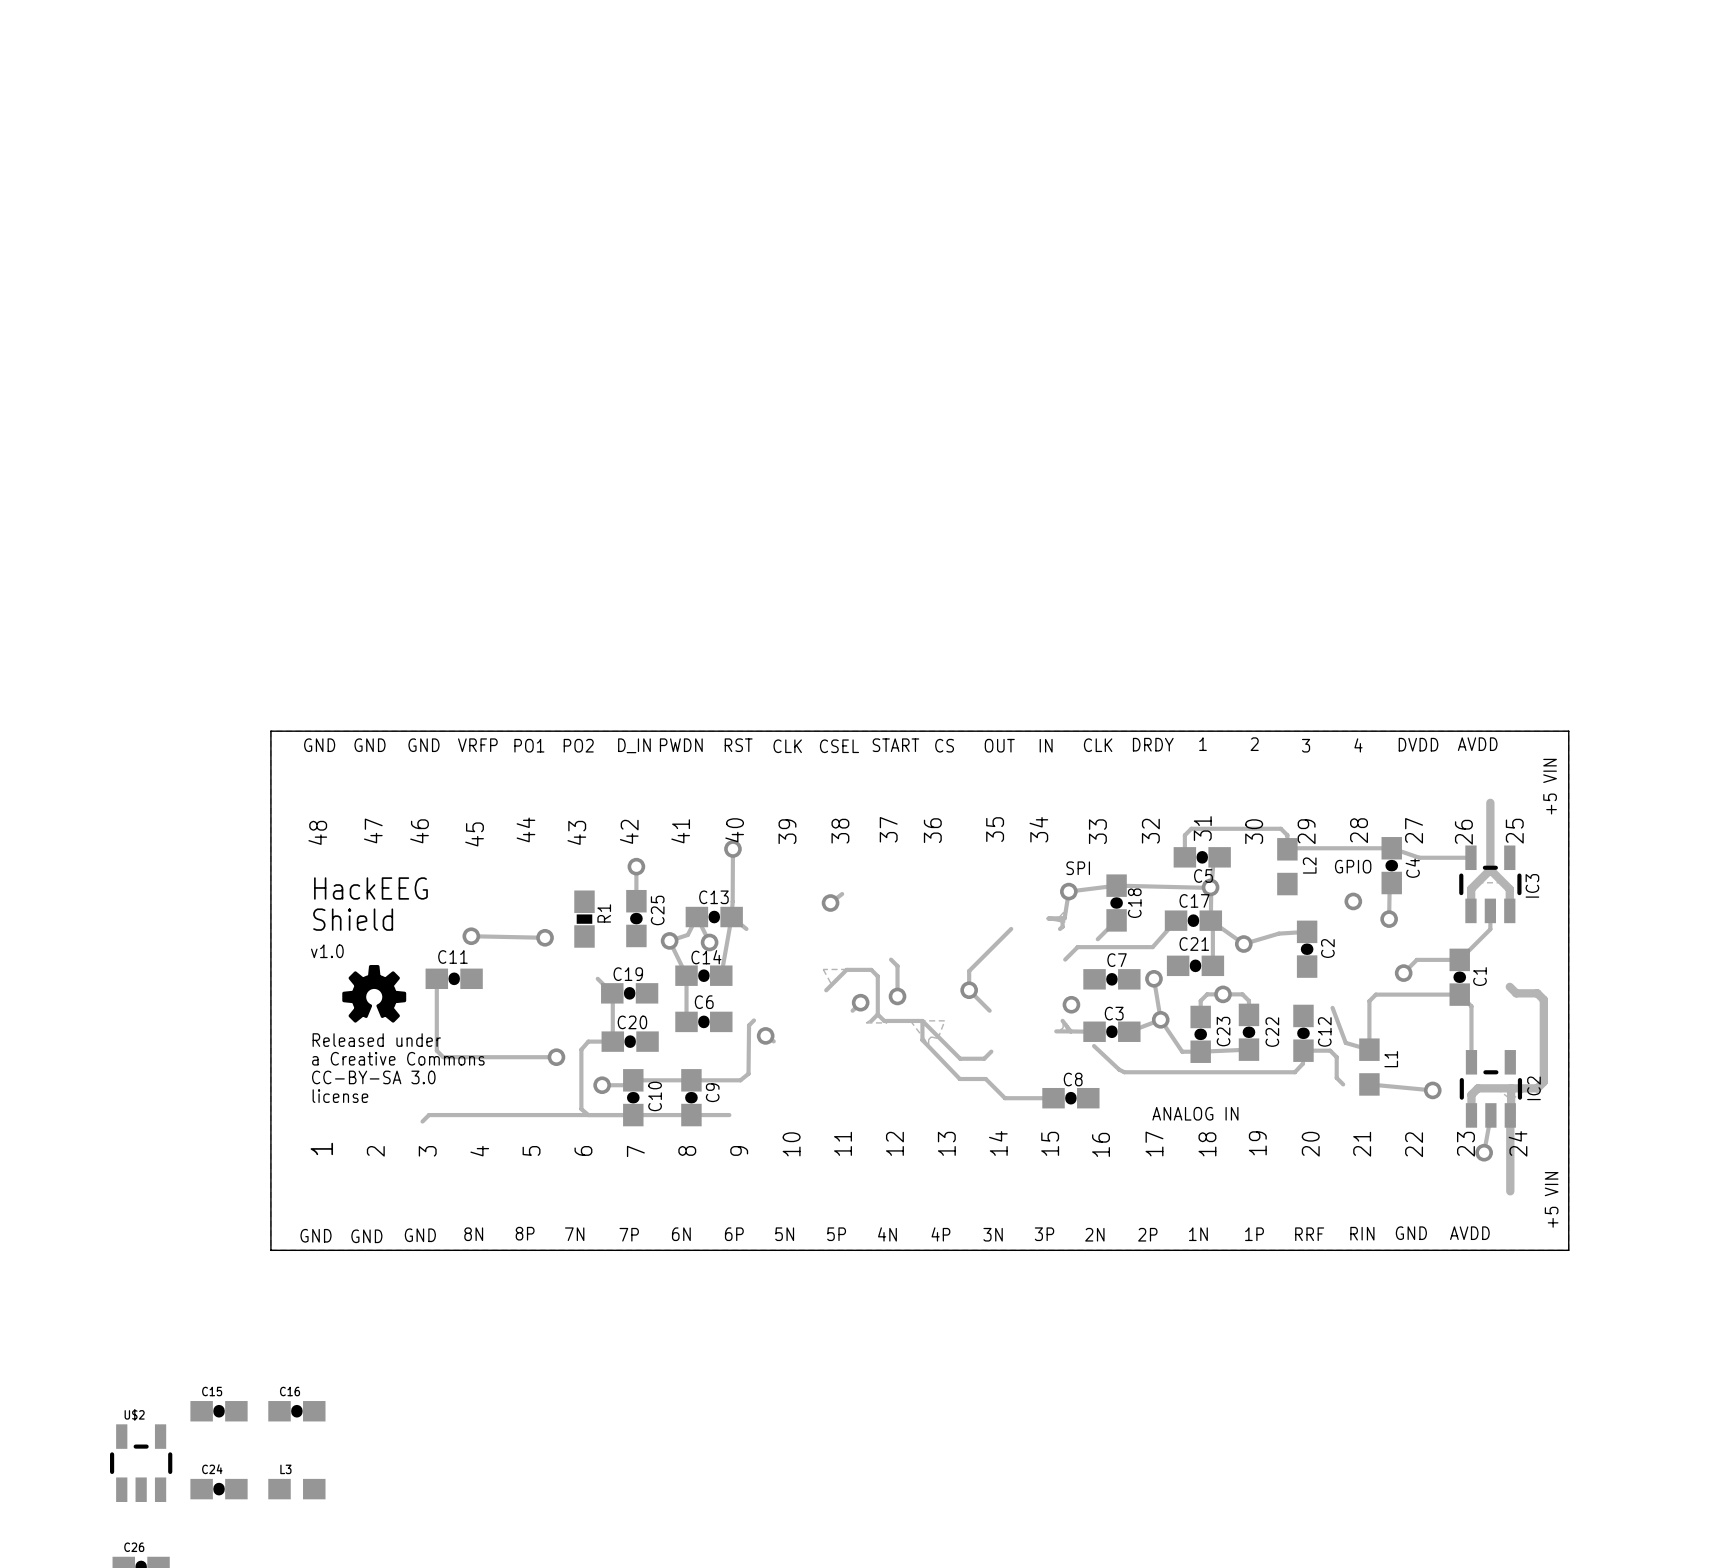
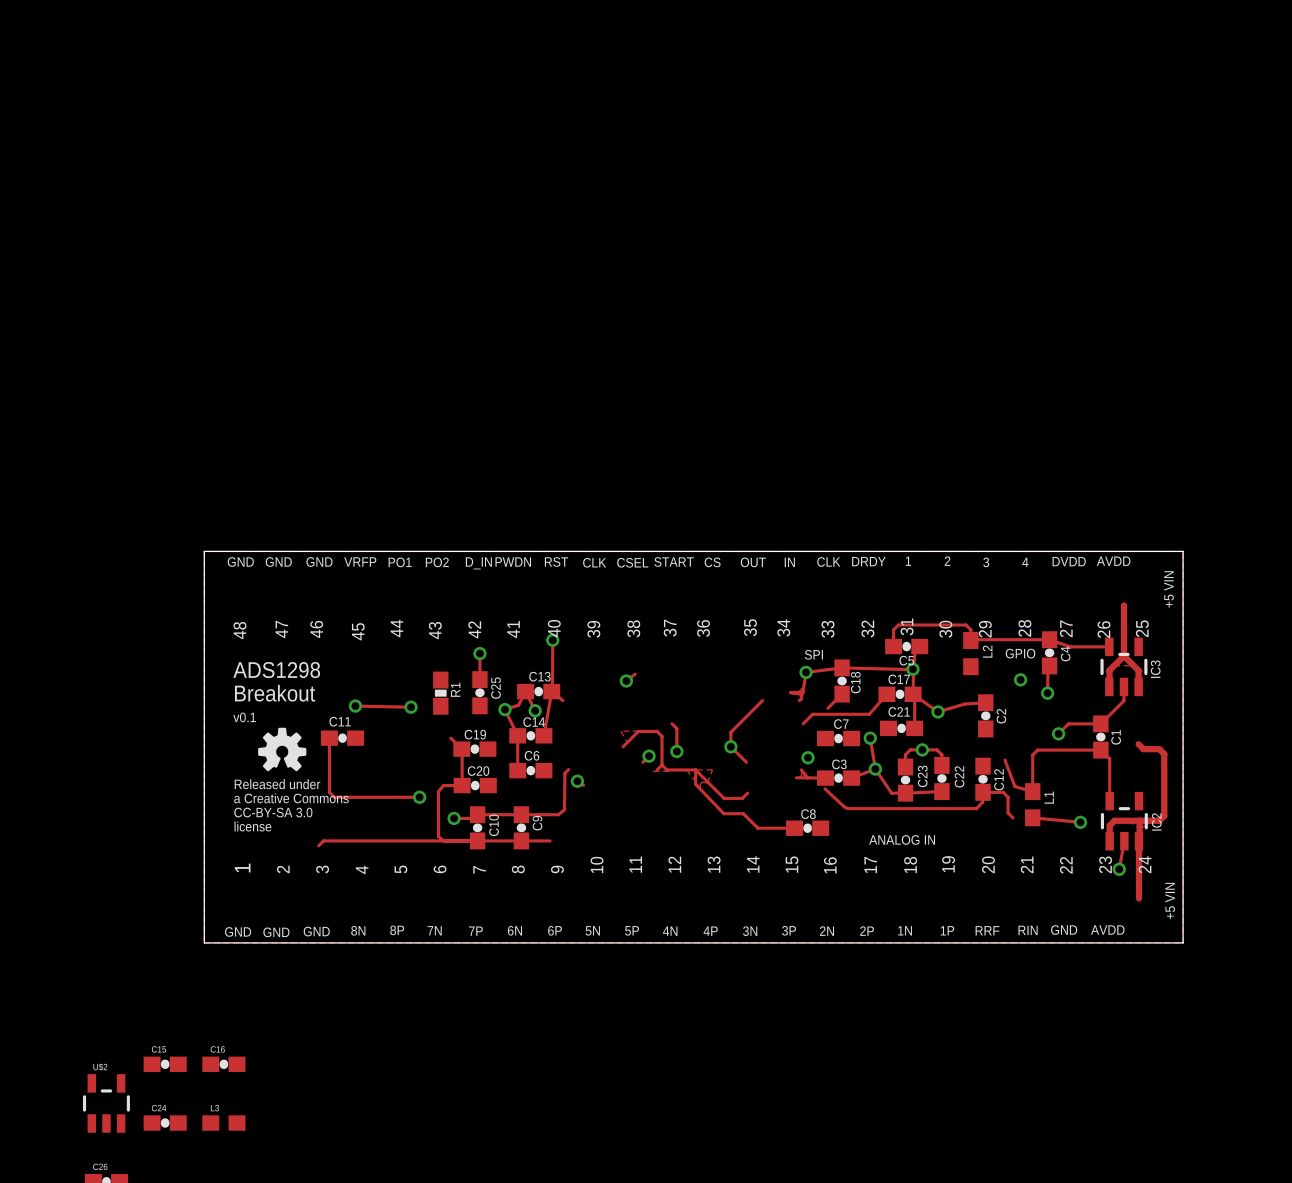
text: HackEEG (370, 888) -> ADS1298 (276, 670)
text: Shield (353, 919) -> Breakout (275, 693)
text: v1.0 (327, 951) -> v0.1 (244, 717)

